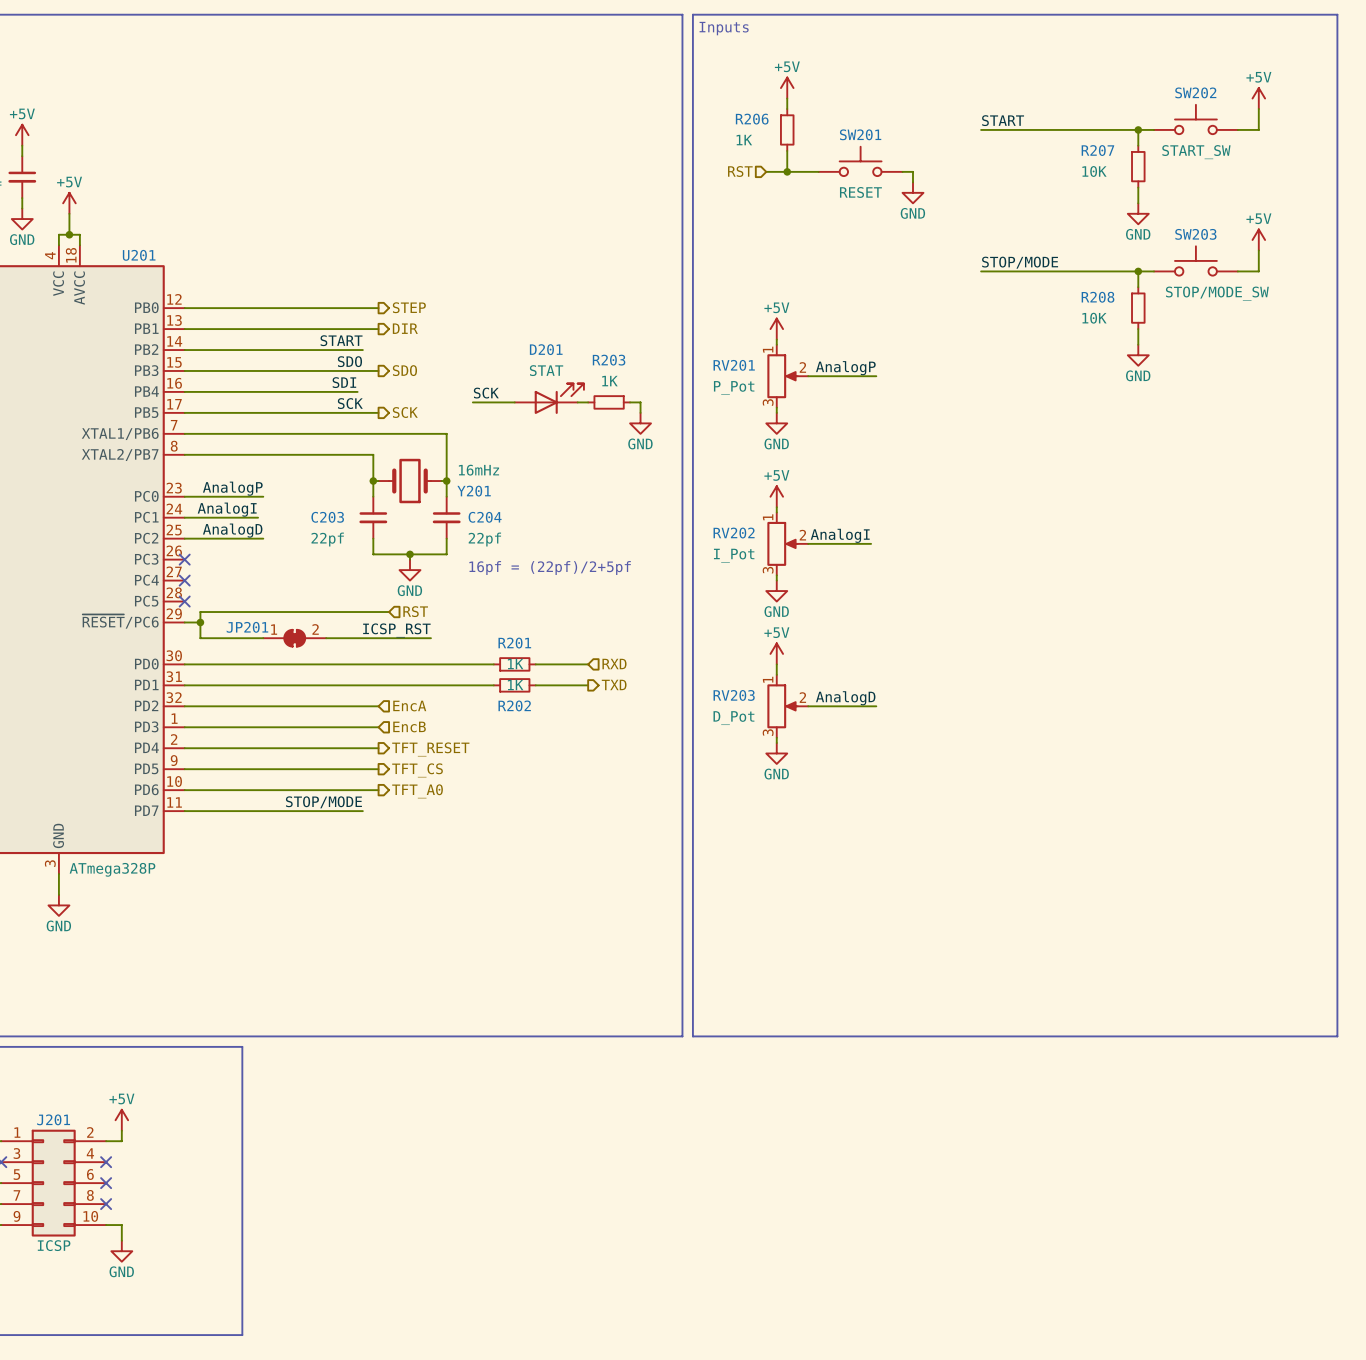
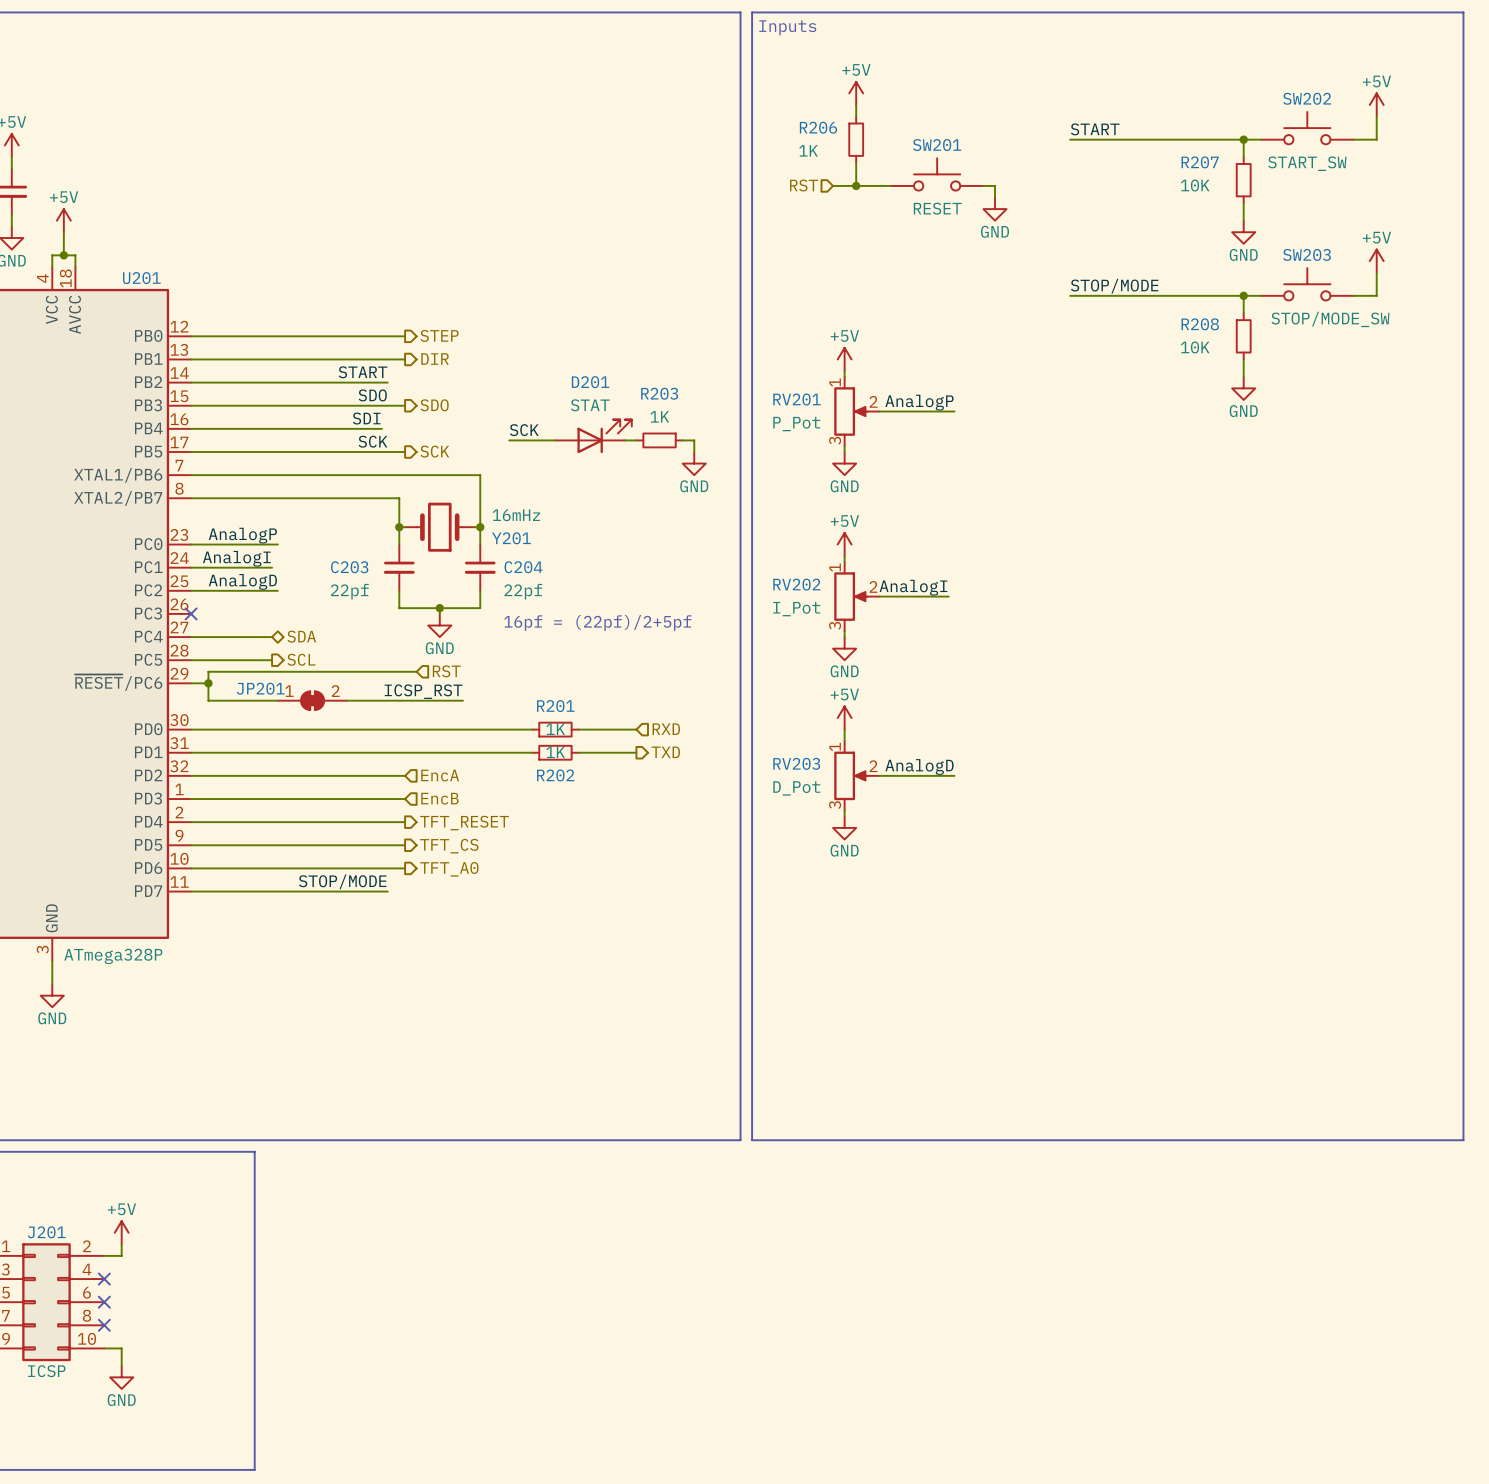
wire: none -> (191, 637) (272, 637)
no-connect mark: (184, 580) -> none
hierarchical label: none -> SDA (301, 636)
wire: none -> (191, 660) (272, 660)
no-connect mark: (184, 601) -> none
hierarchical label: none -> SCL (301, 659)

